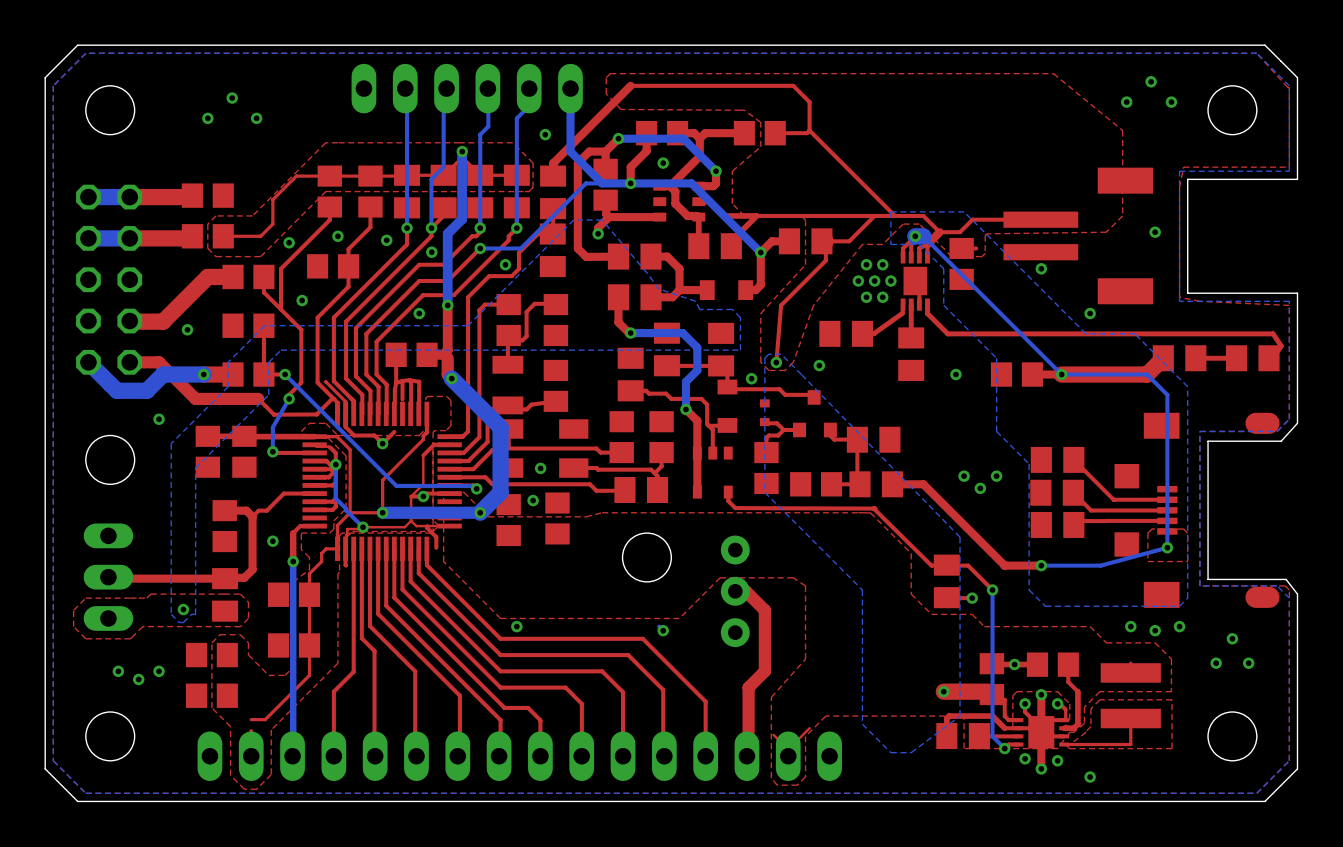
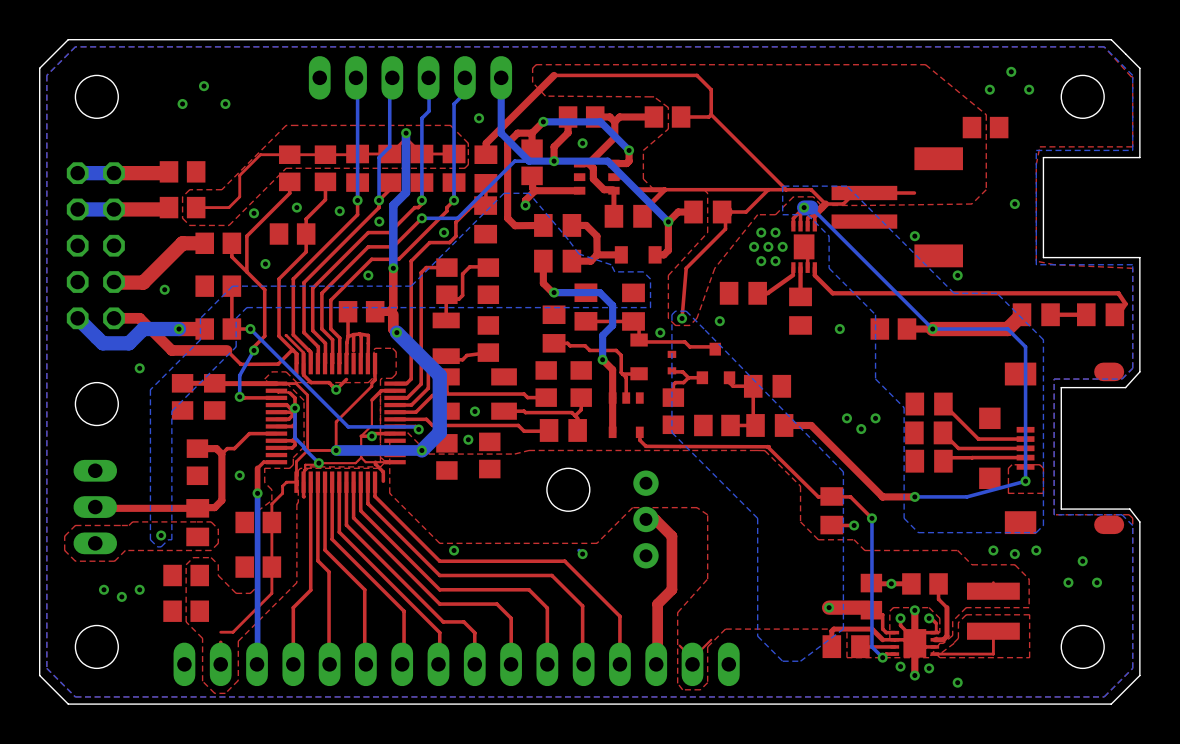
top zone outline: (919, 224) (951, 256) (981, 256) (985, 253) (986, 233) -> (807, 196) (813, 196) (821, 205) (866, 205)
part position: (1078, 235) -> (897, 207)
part rotation: 0° (961, 263) -> 90° clockwise (985, 127)
part position: (961, 263) -> (985, 127)

